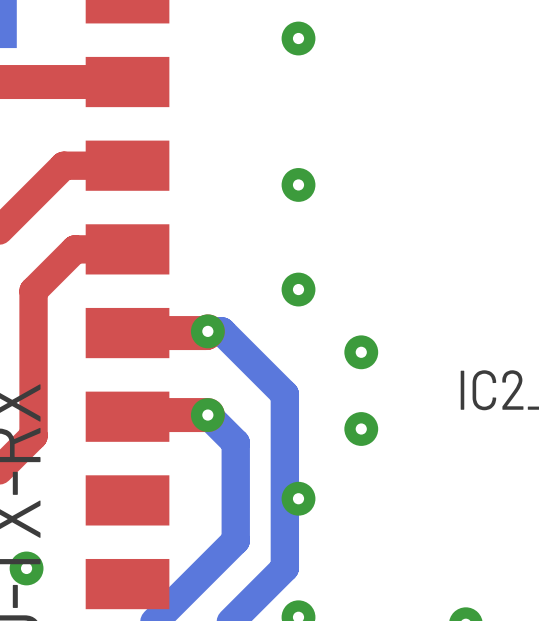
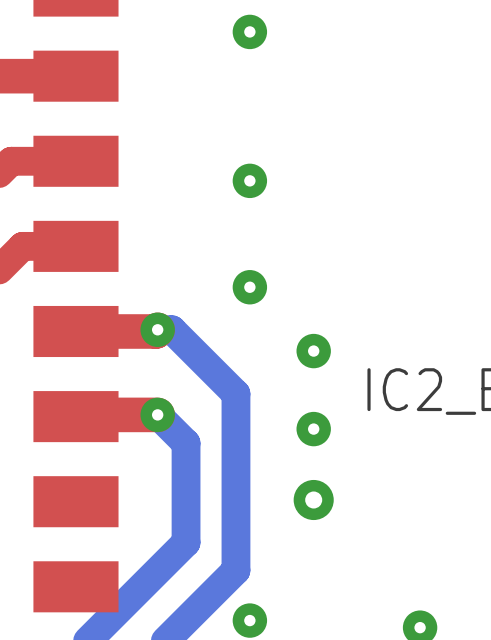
via: (298, 498) -> none
via: none -> (313, 500)

